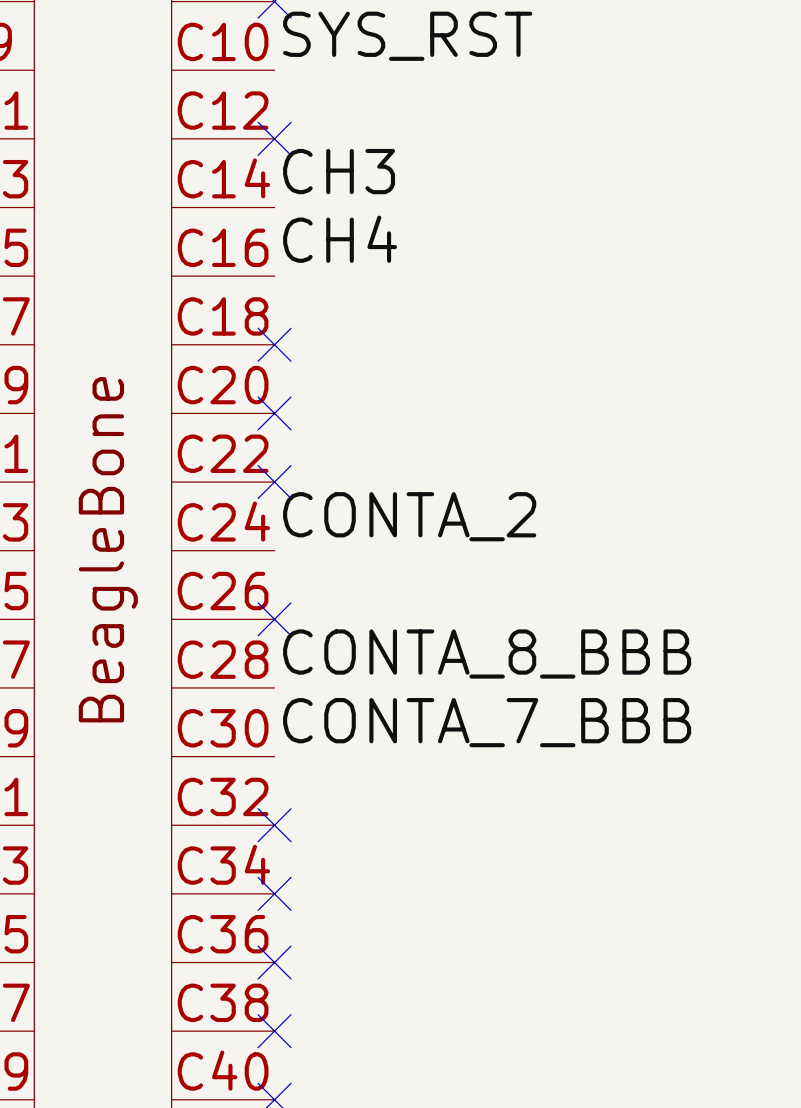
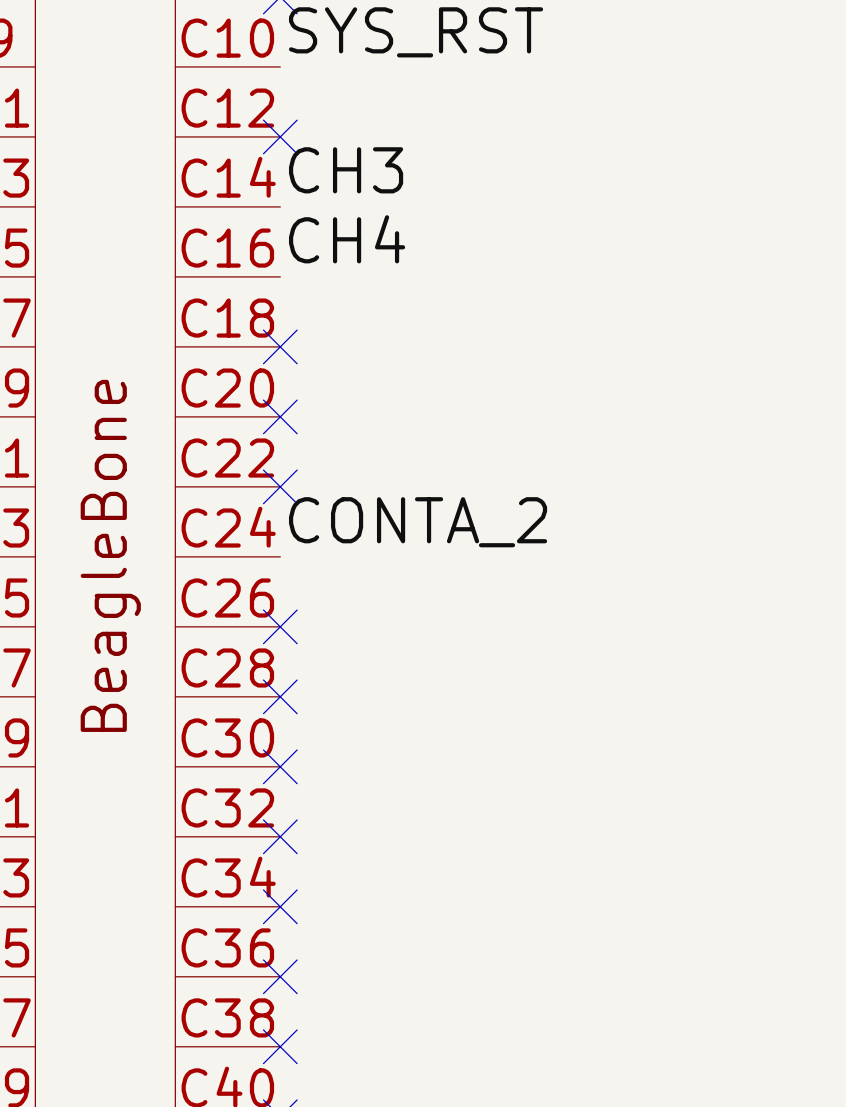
label: CONTA_8_BBB (487, 654) -> none
no-connect mark: none -> (280, 696)
label: CONTA_7_BBB (487, 722) -> none
no-connect mark: none -> (280, 766)

